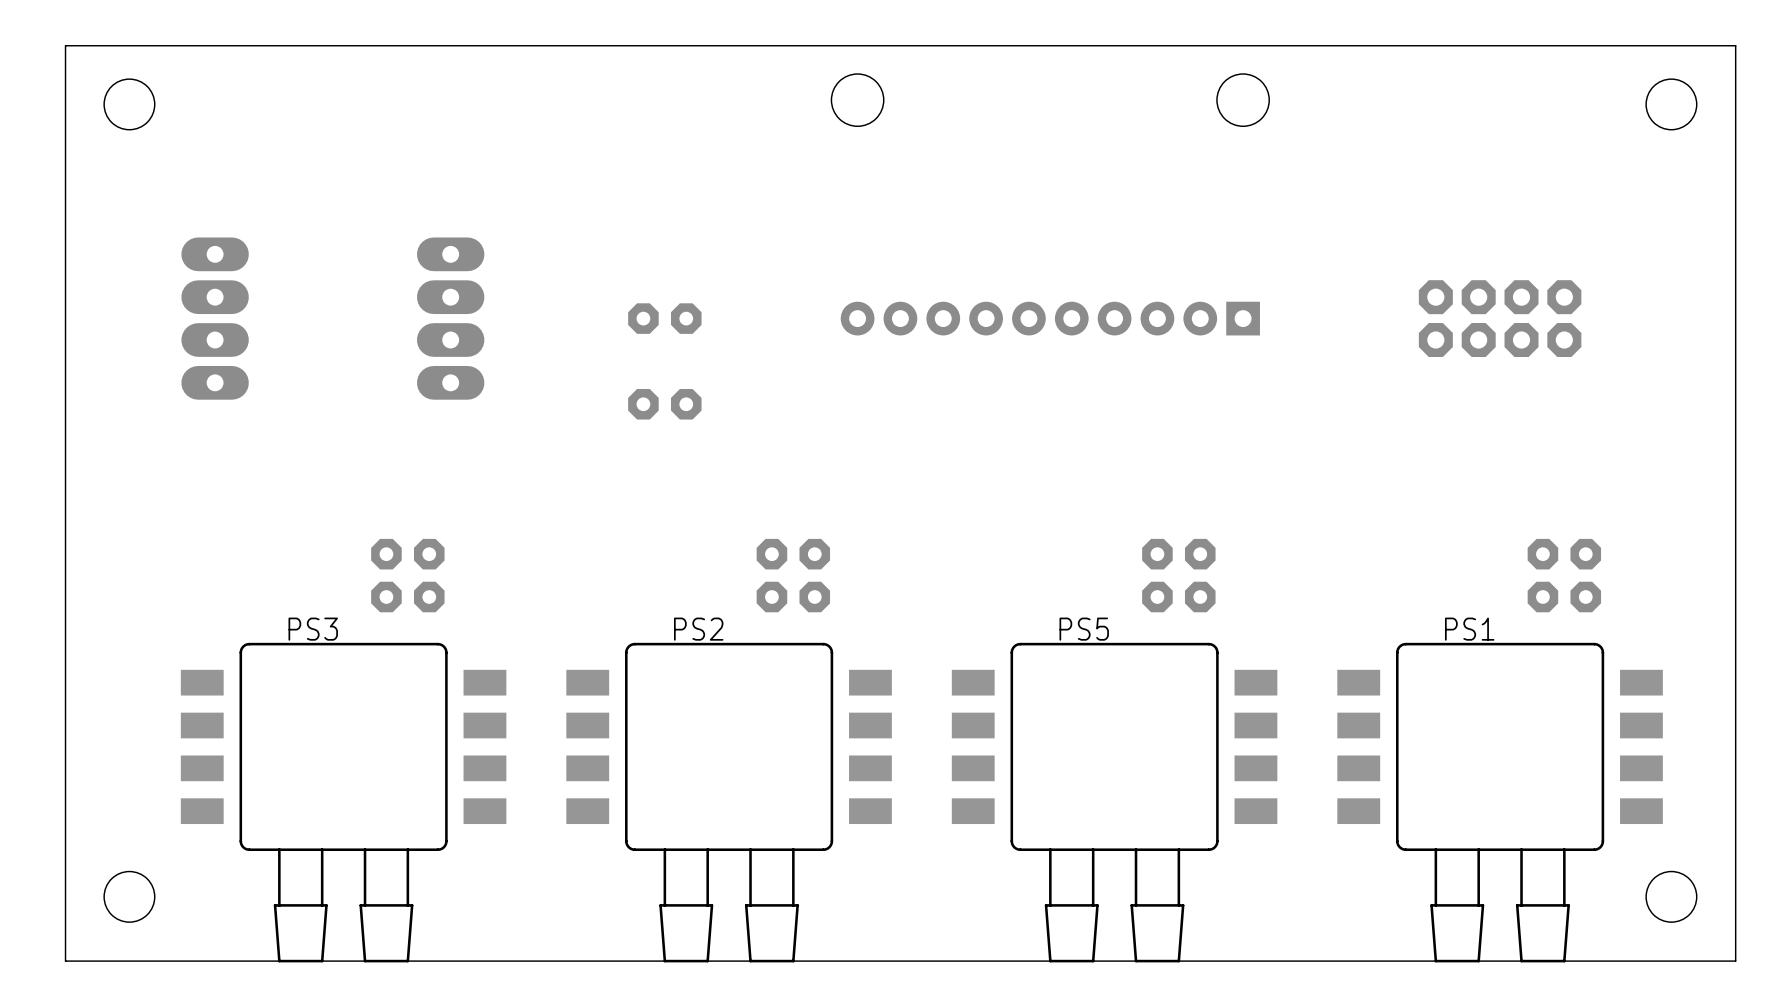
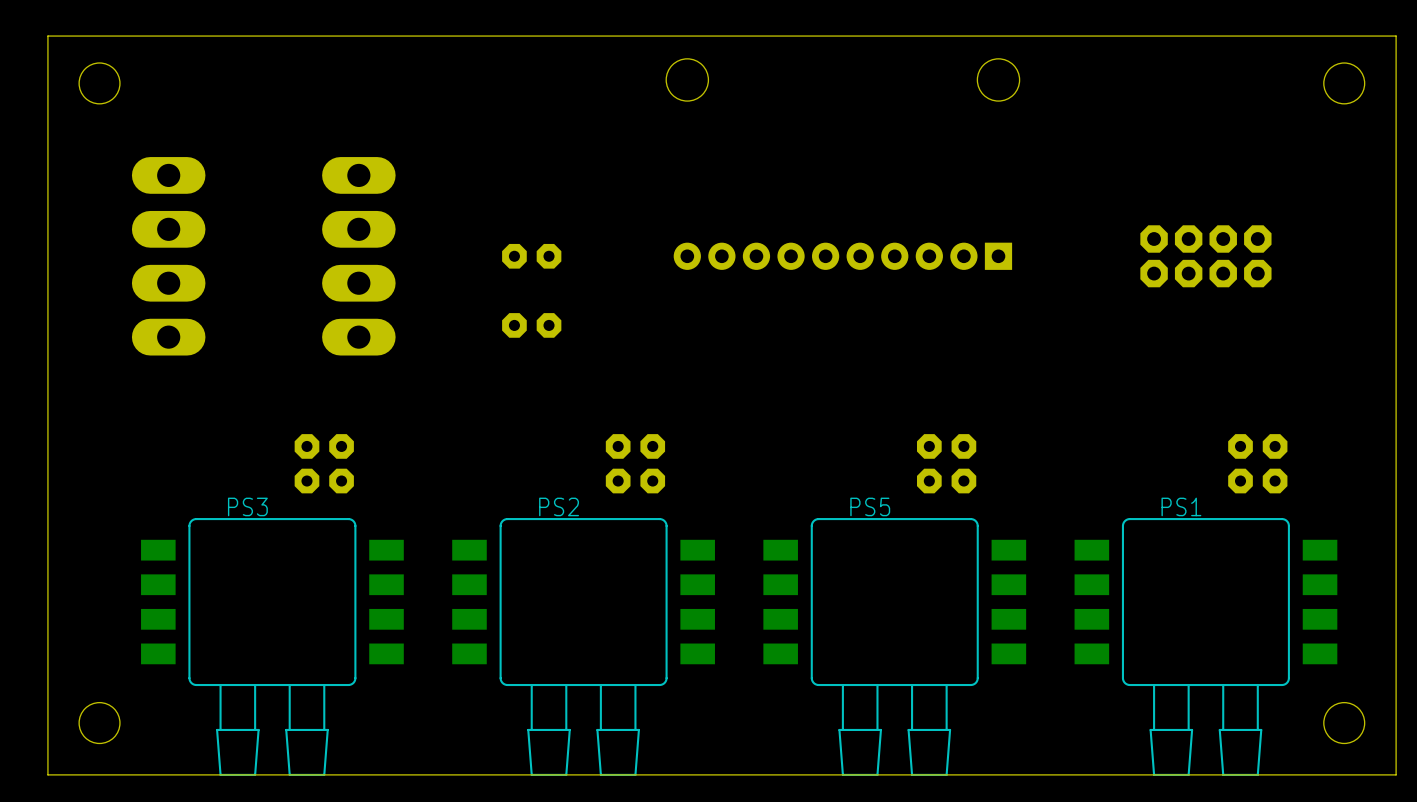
part footprint: [181, 237, 249, 400] -> [131, 157, 206, 356]
part footprint: [416, 237, 485, 400] -> [322, 157, 396, 356]

